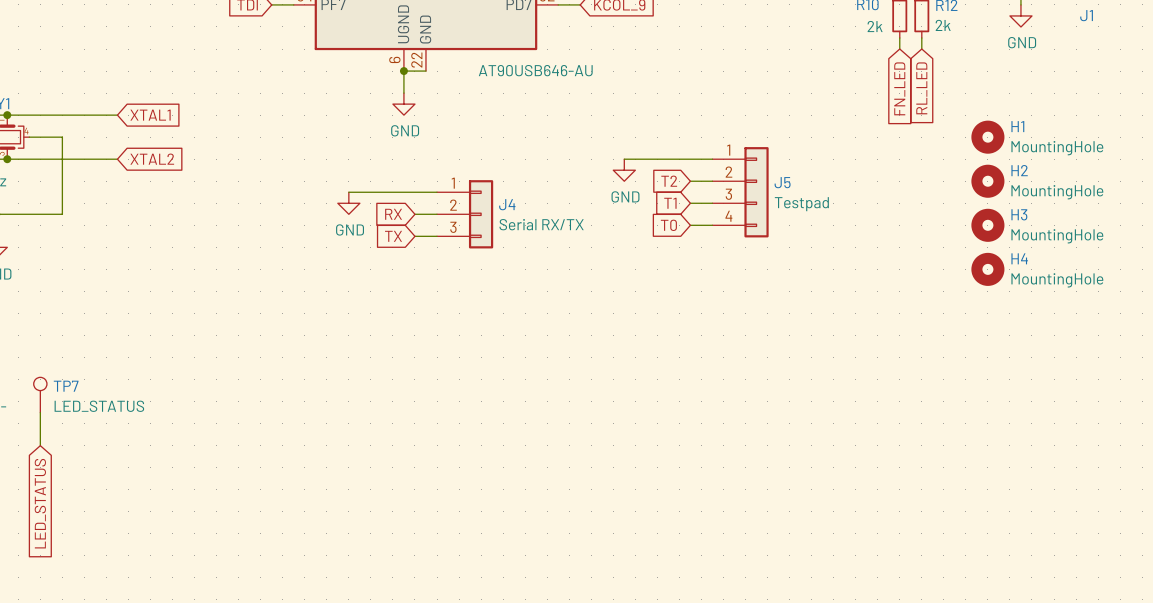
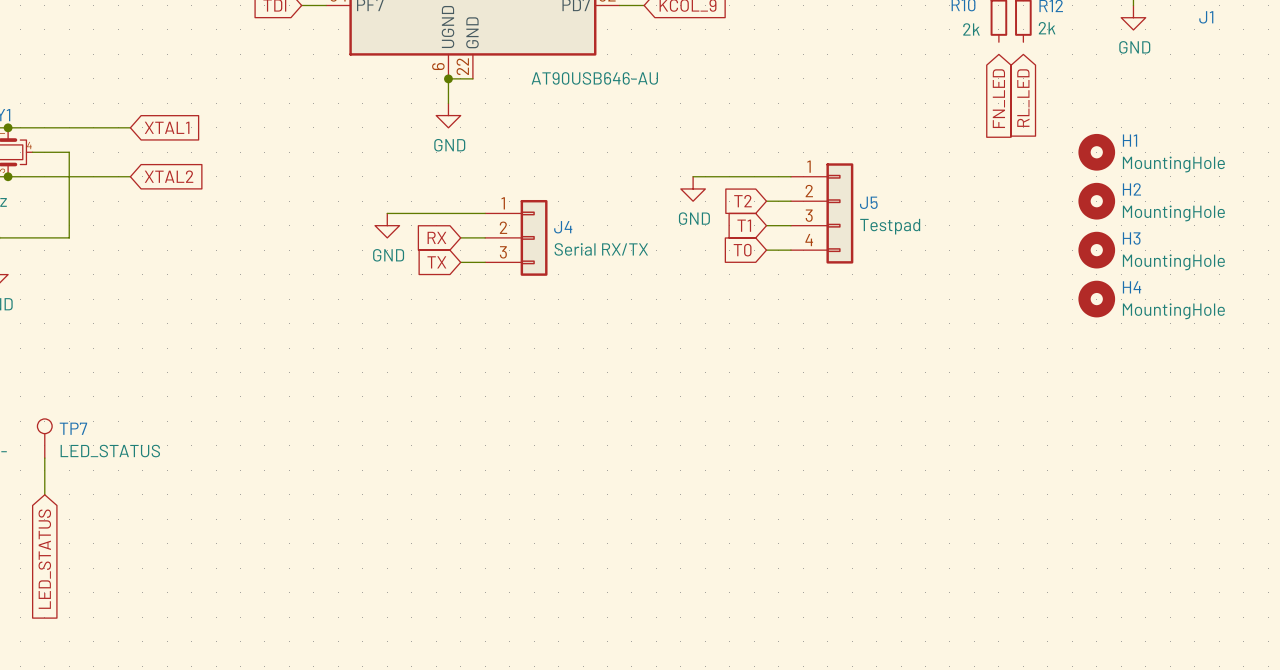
wire: (899, 38) (899, 49) -> none
wire: (921, 38) (921, 49) -> none

